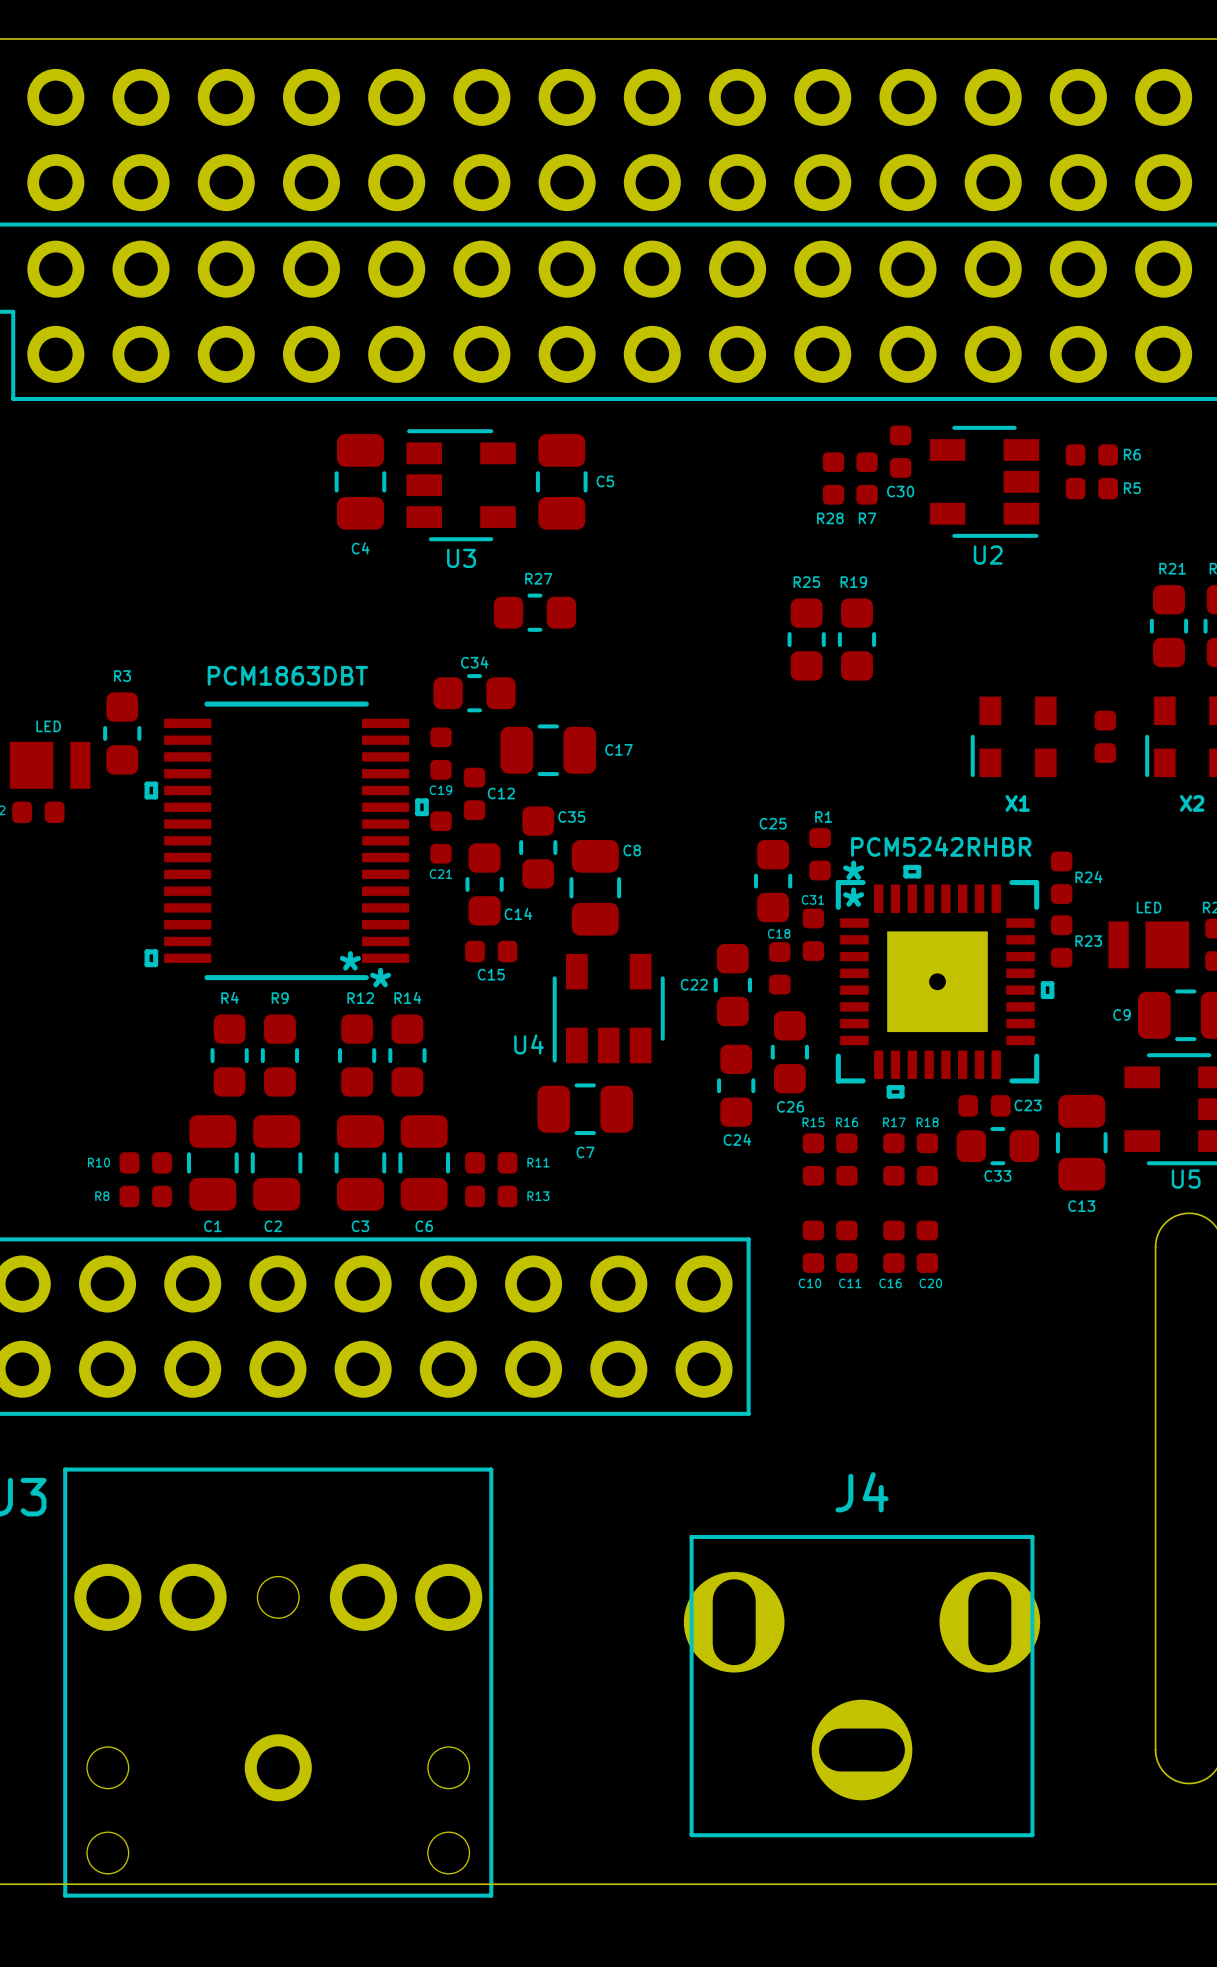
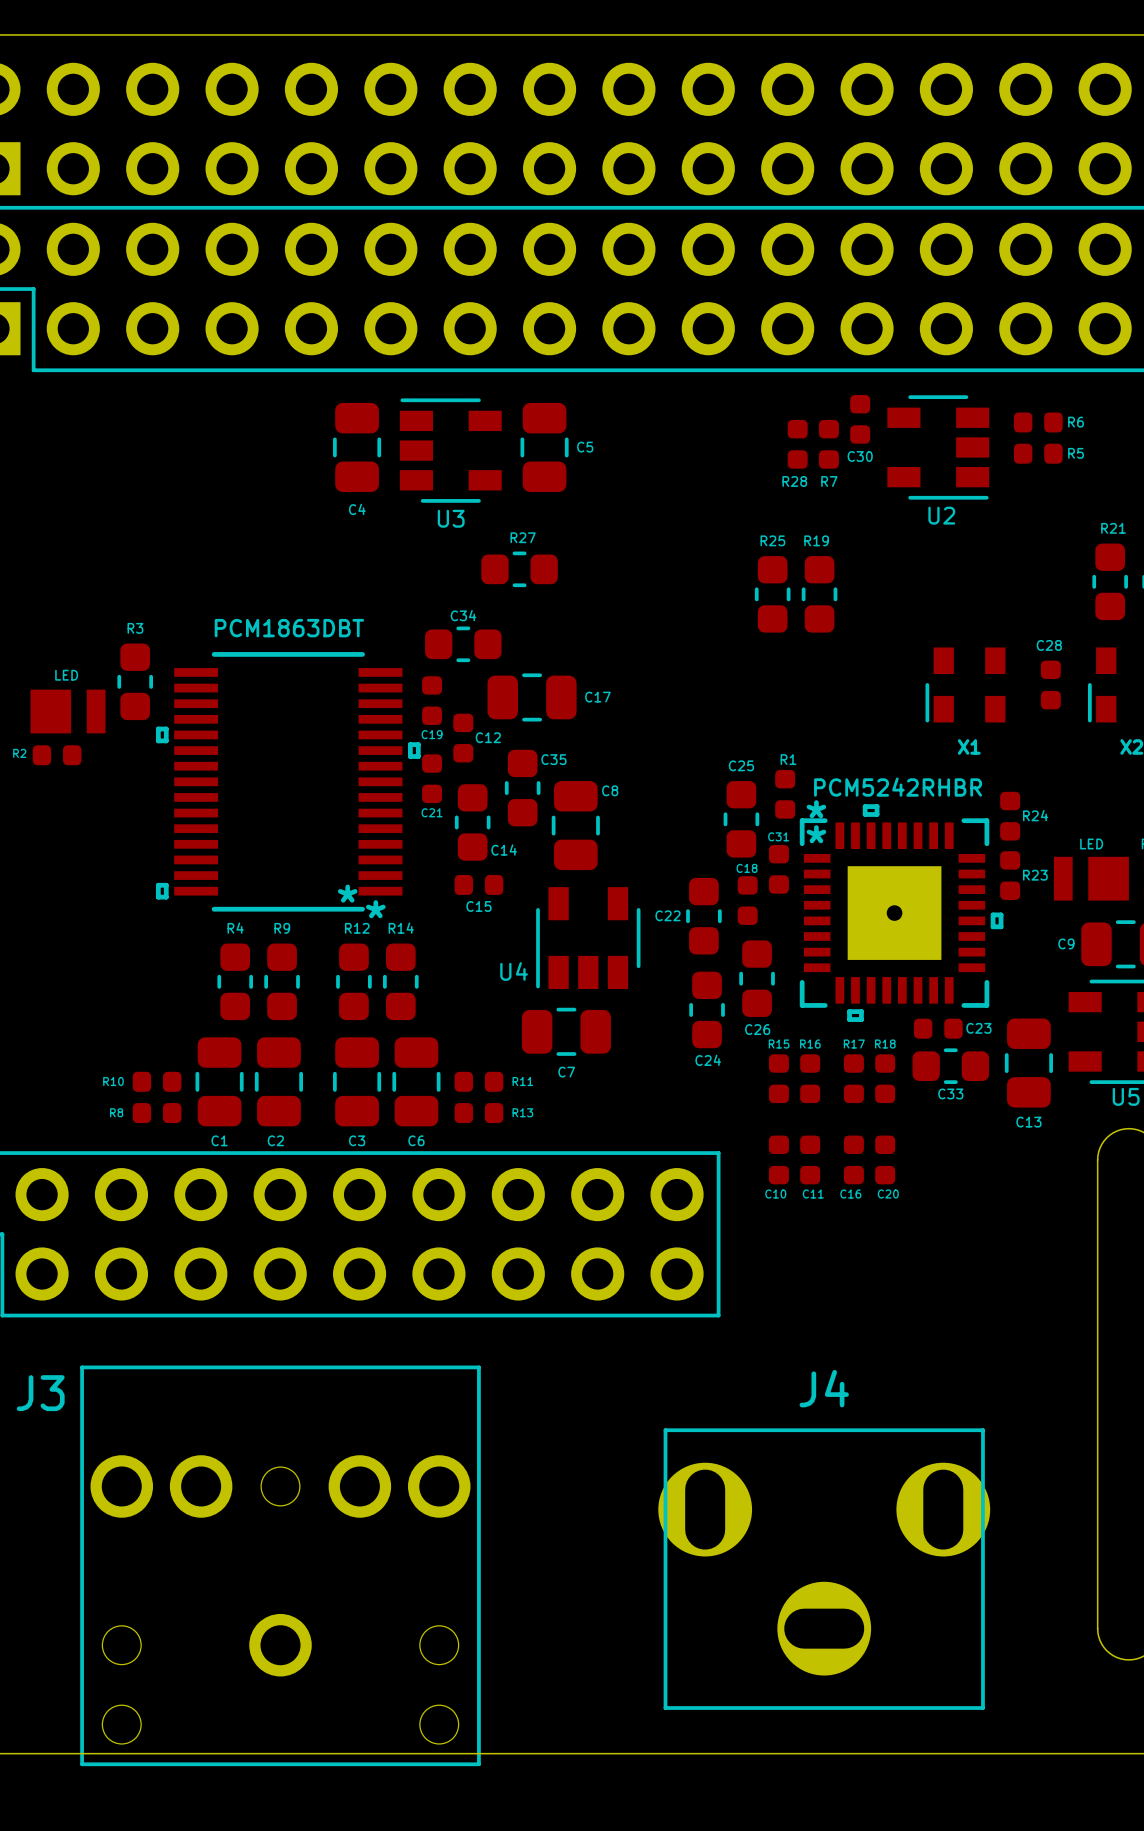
C28 name: none -> C28 (1049, 645)

